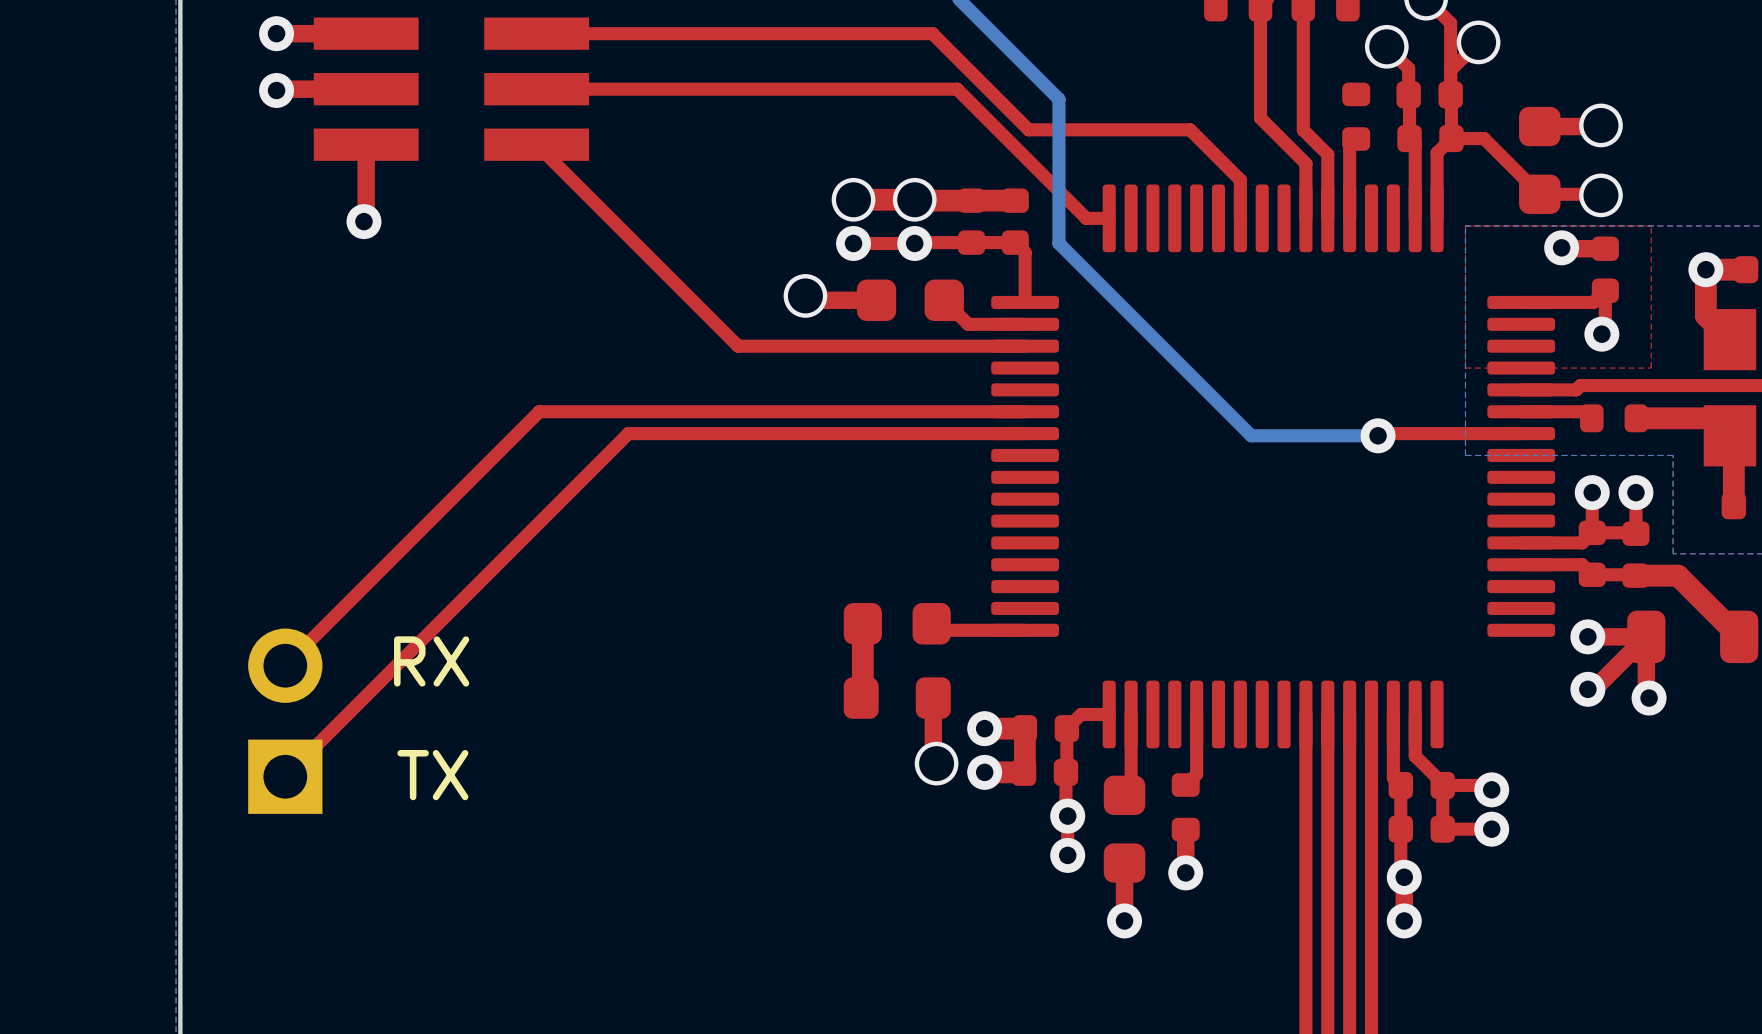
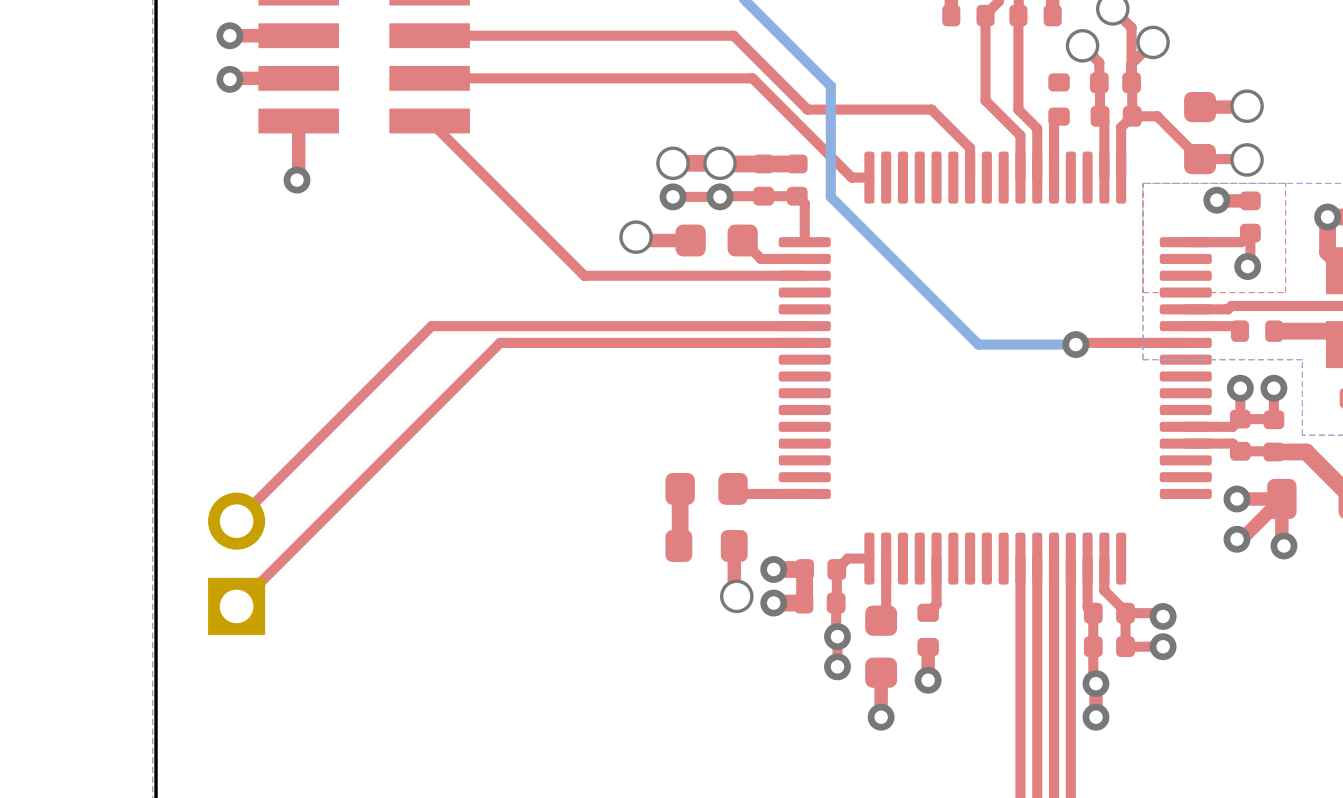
text: RX (431, 661) -> none
text: TX (432, 775) -> none

